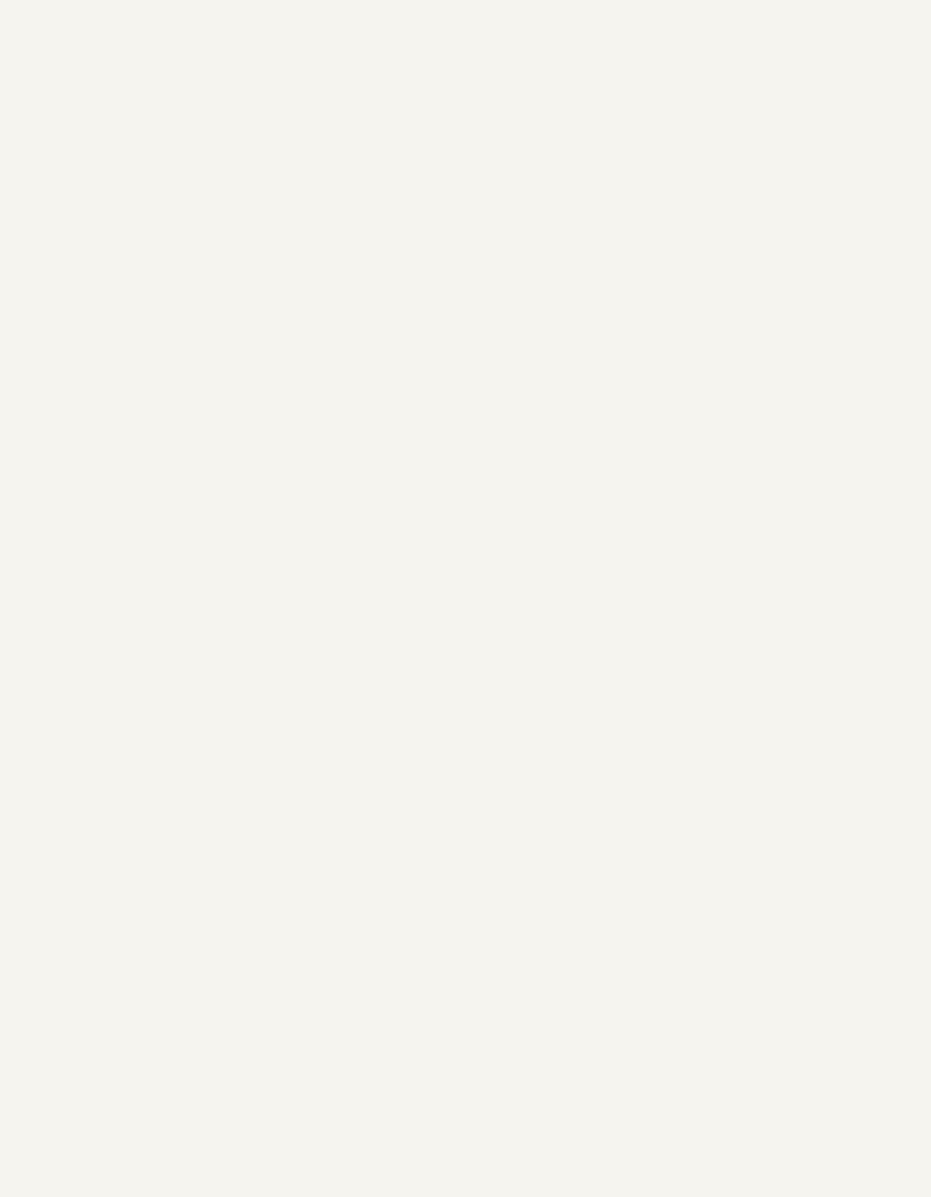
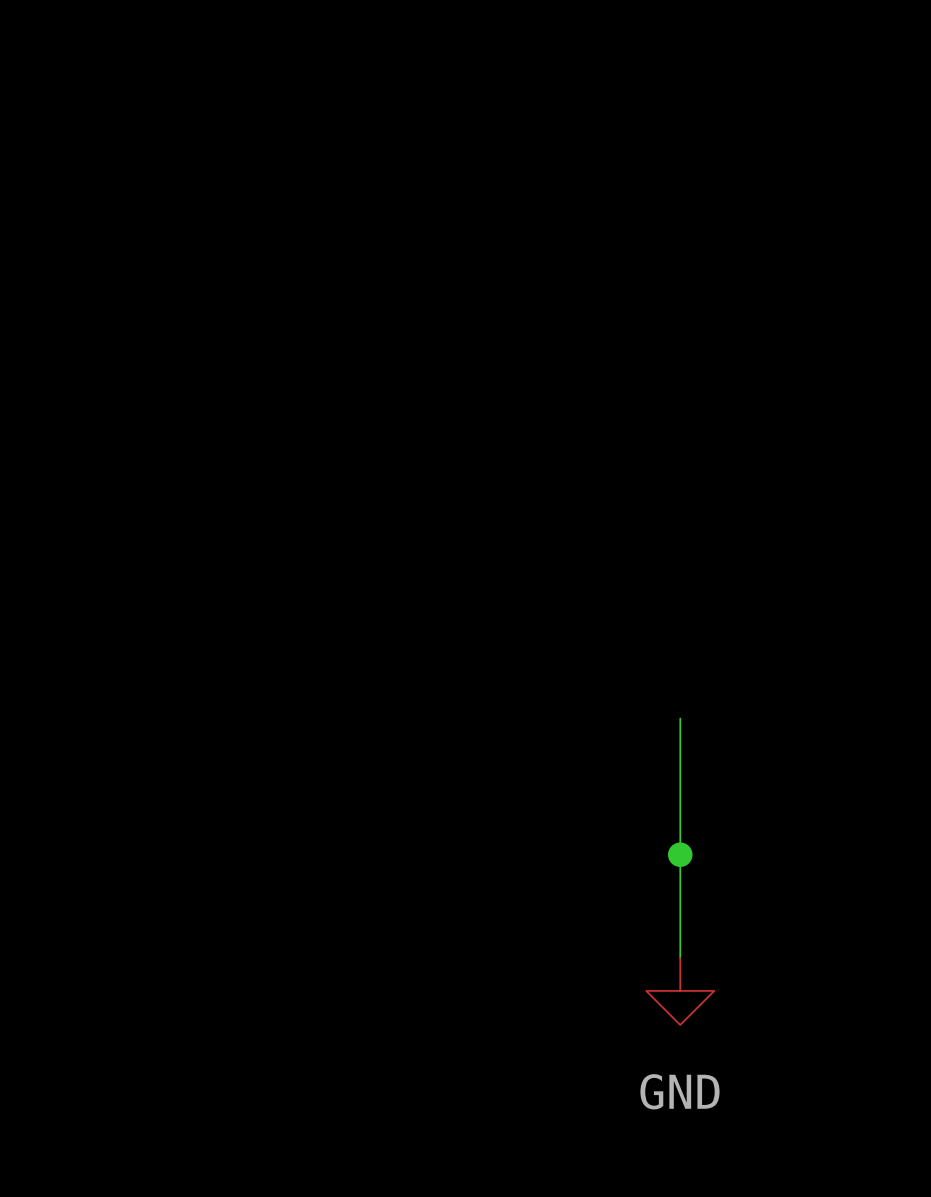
wire: none -> (680, 718) (680, 956)
junction: none -> (680, 854)
power symbol: none -> GND (680, 990)

